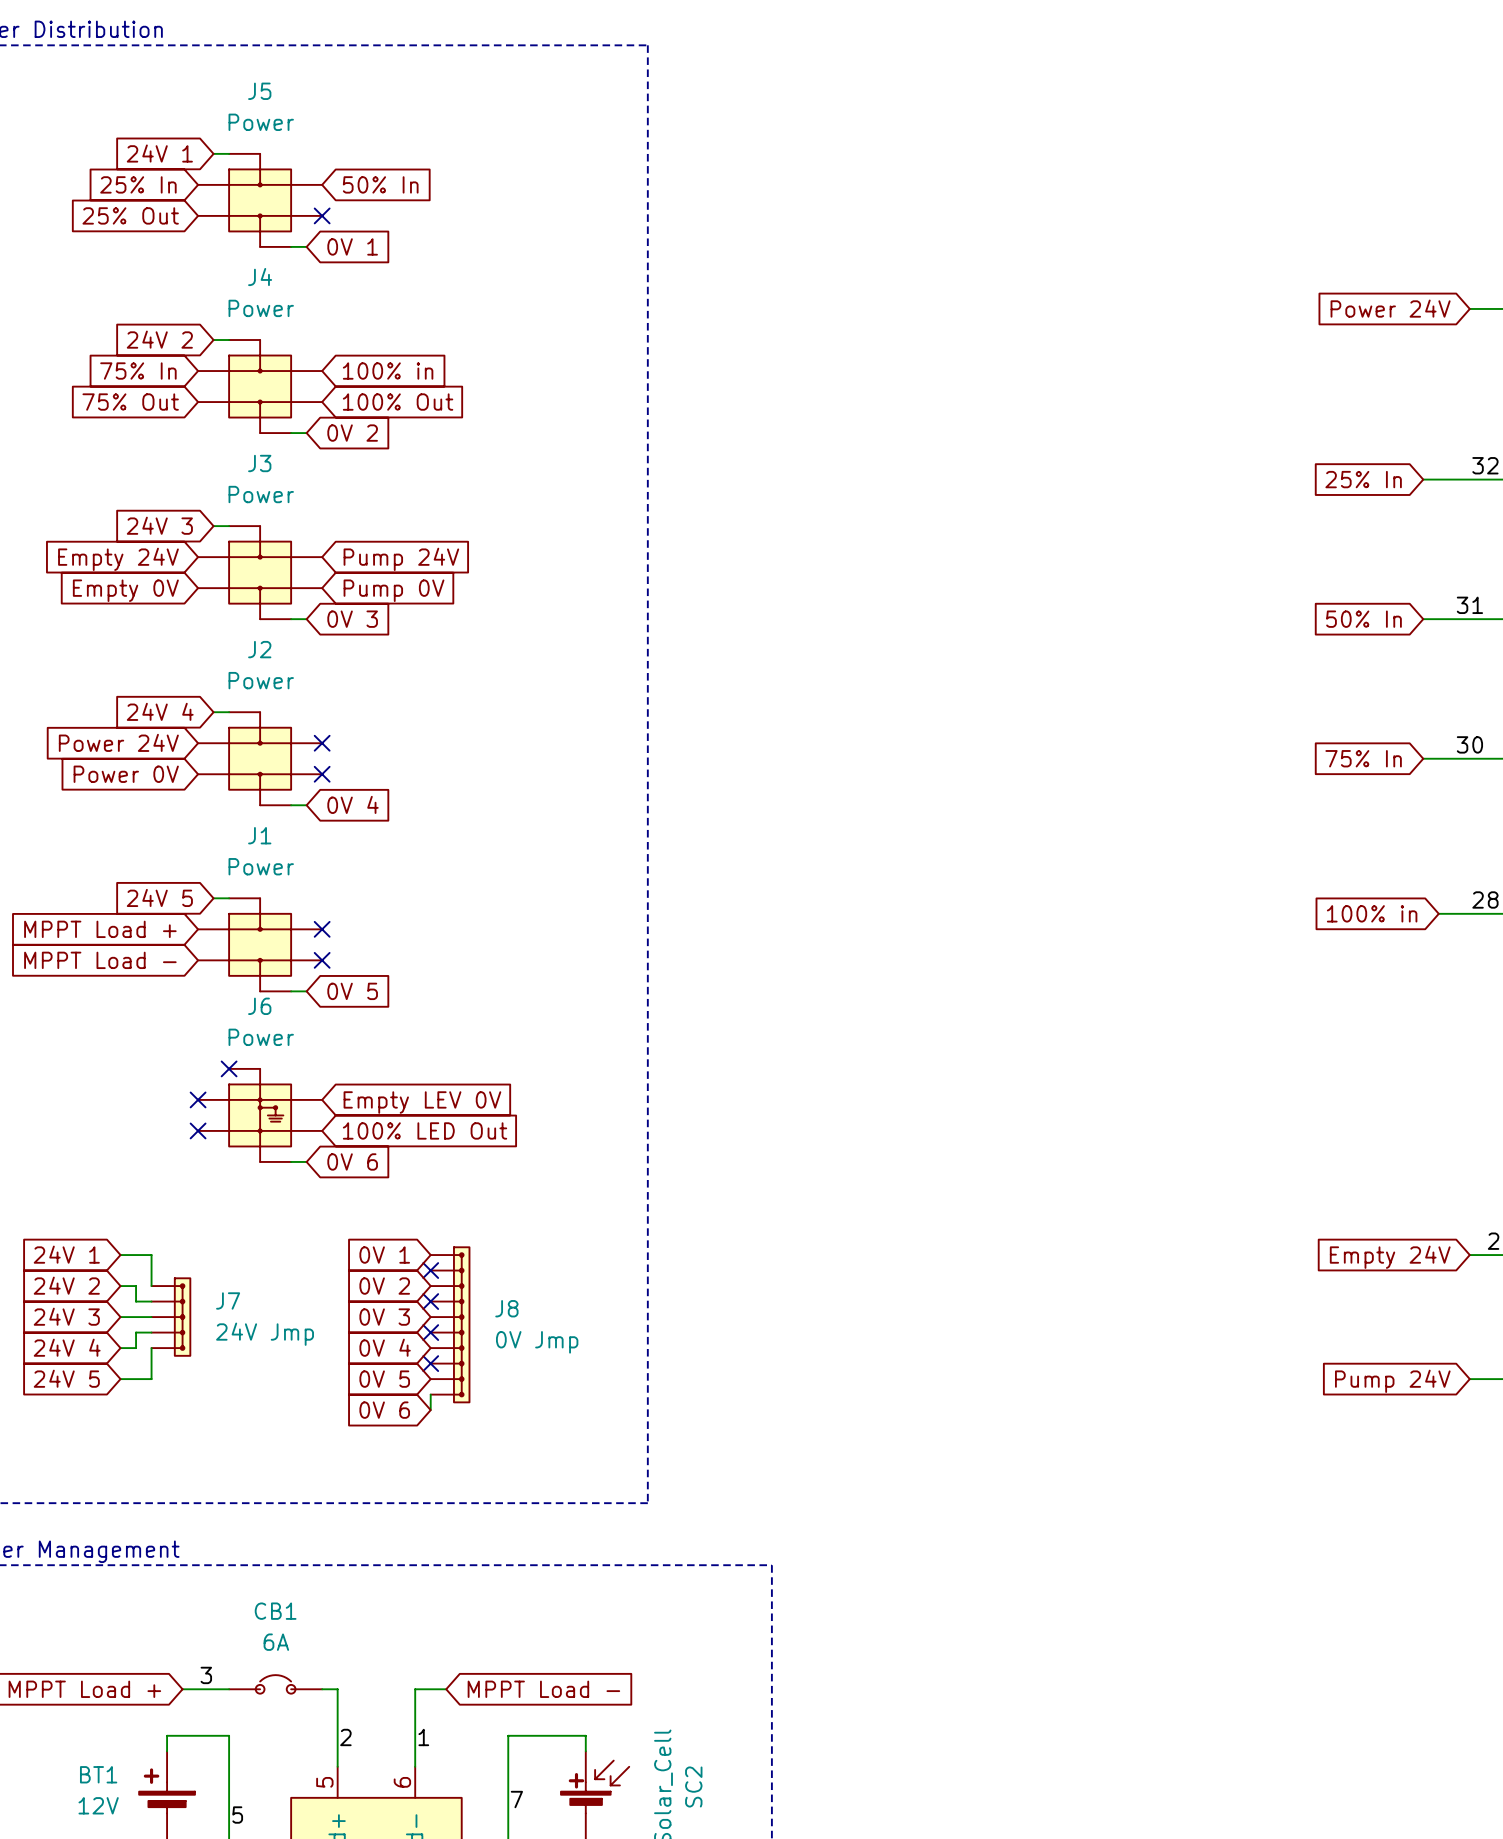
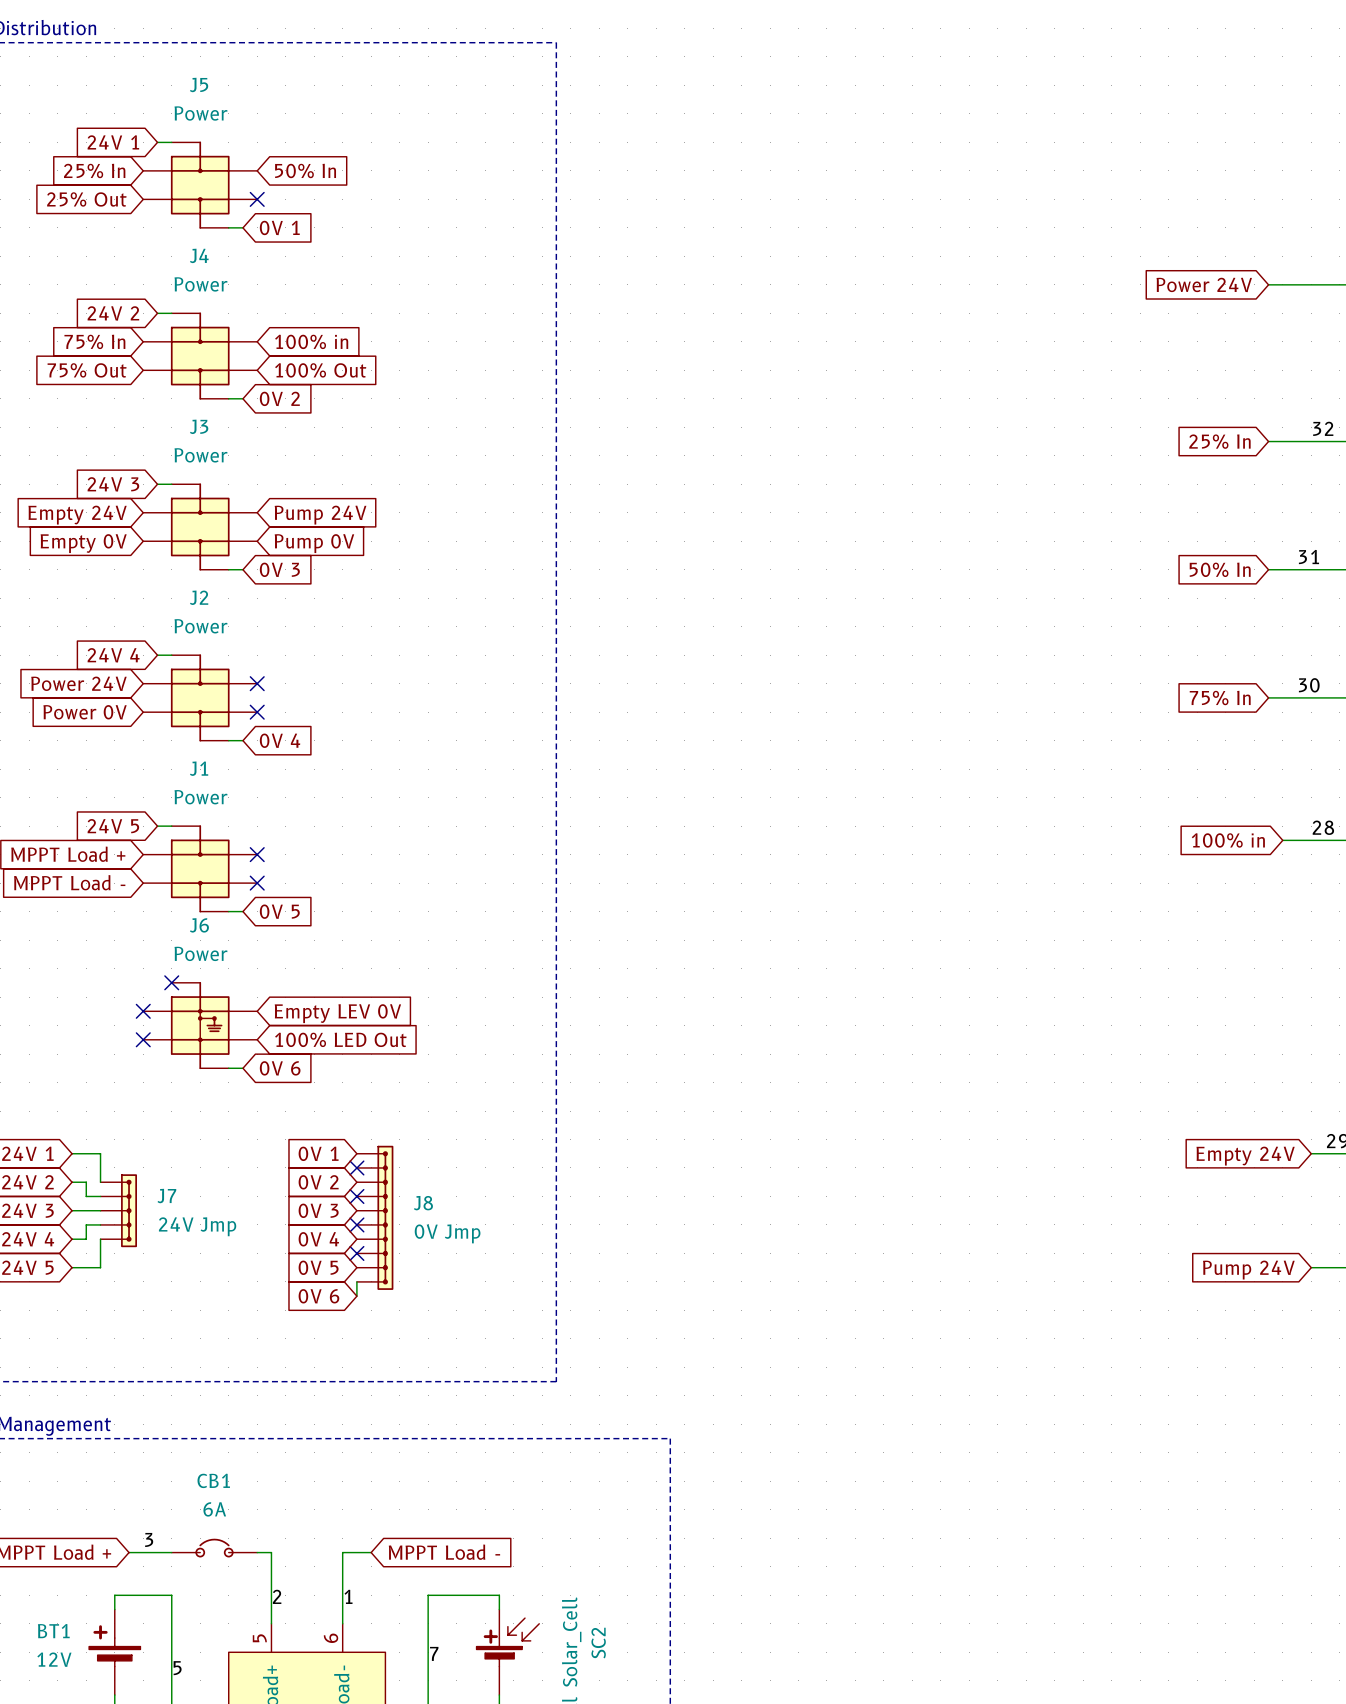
global label position: Power 24V (1390, 308) -> Power 24V (1204, 284)
wire: none -> (1268, 284) (1311, 284)

